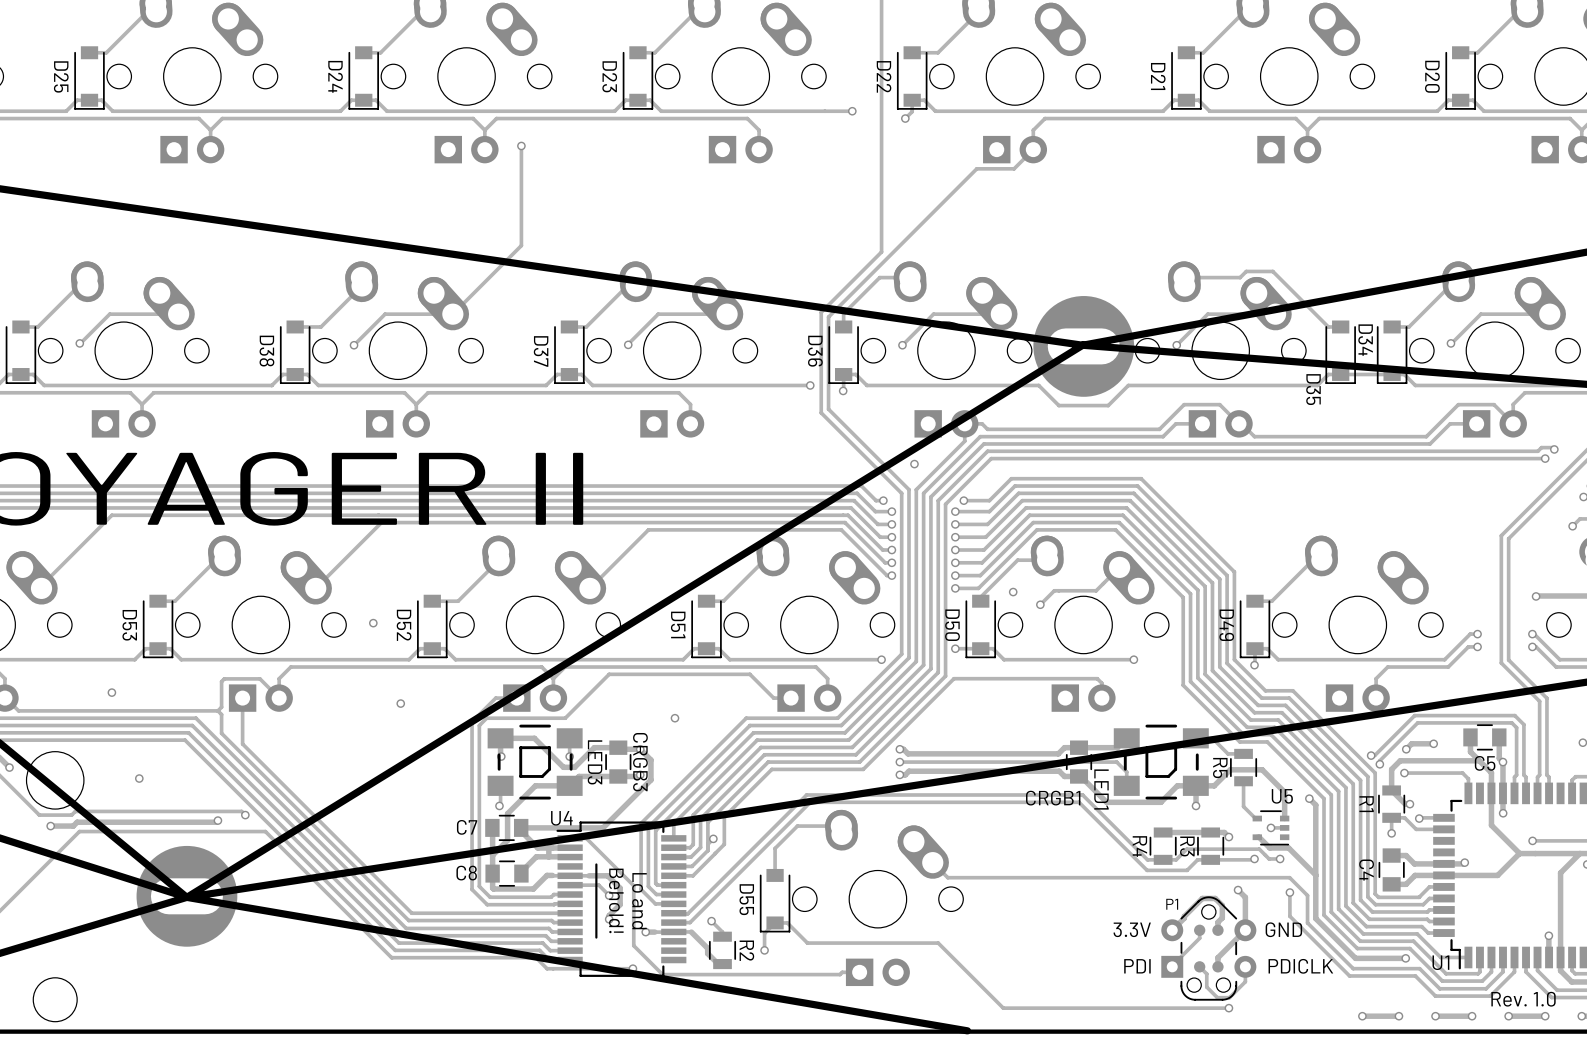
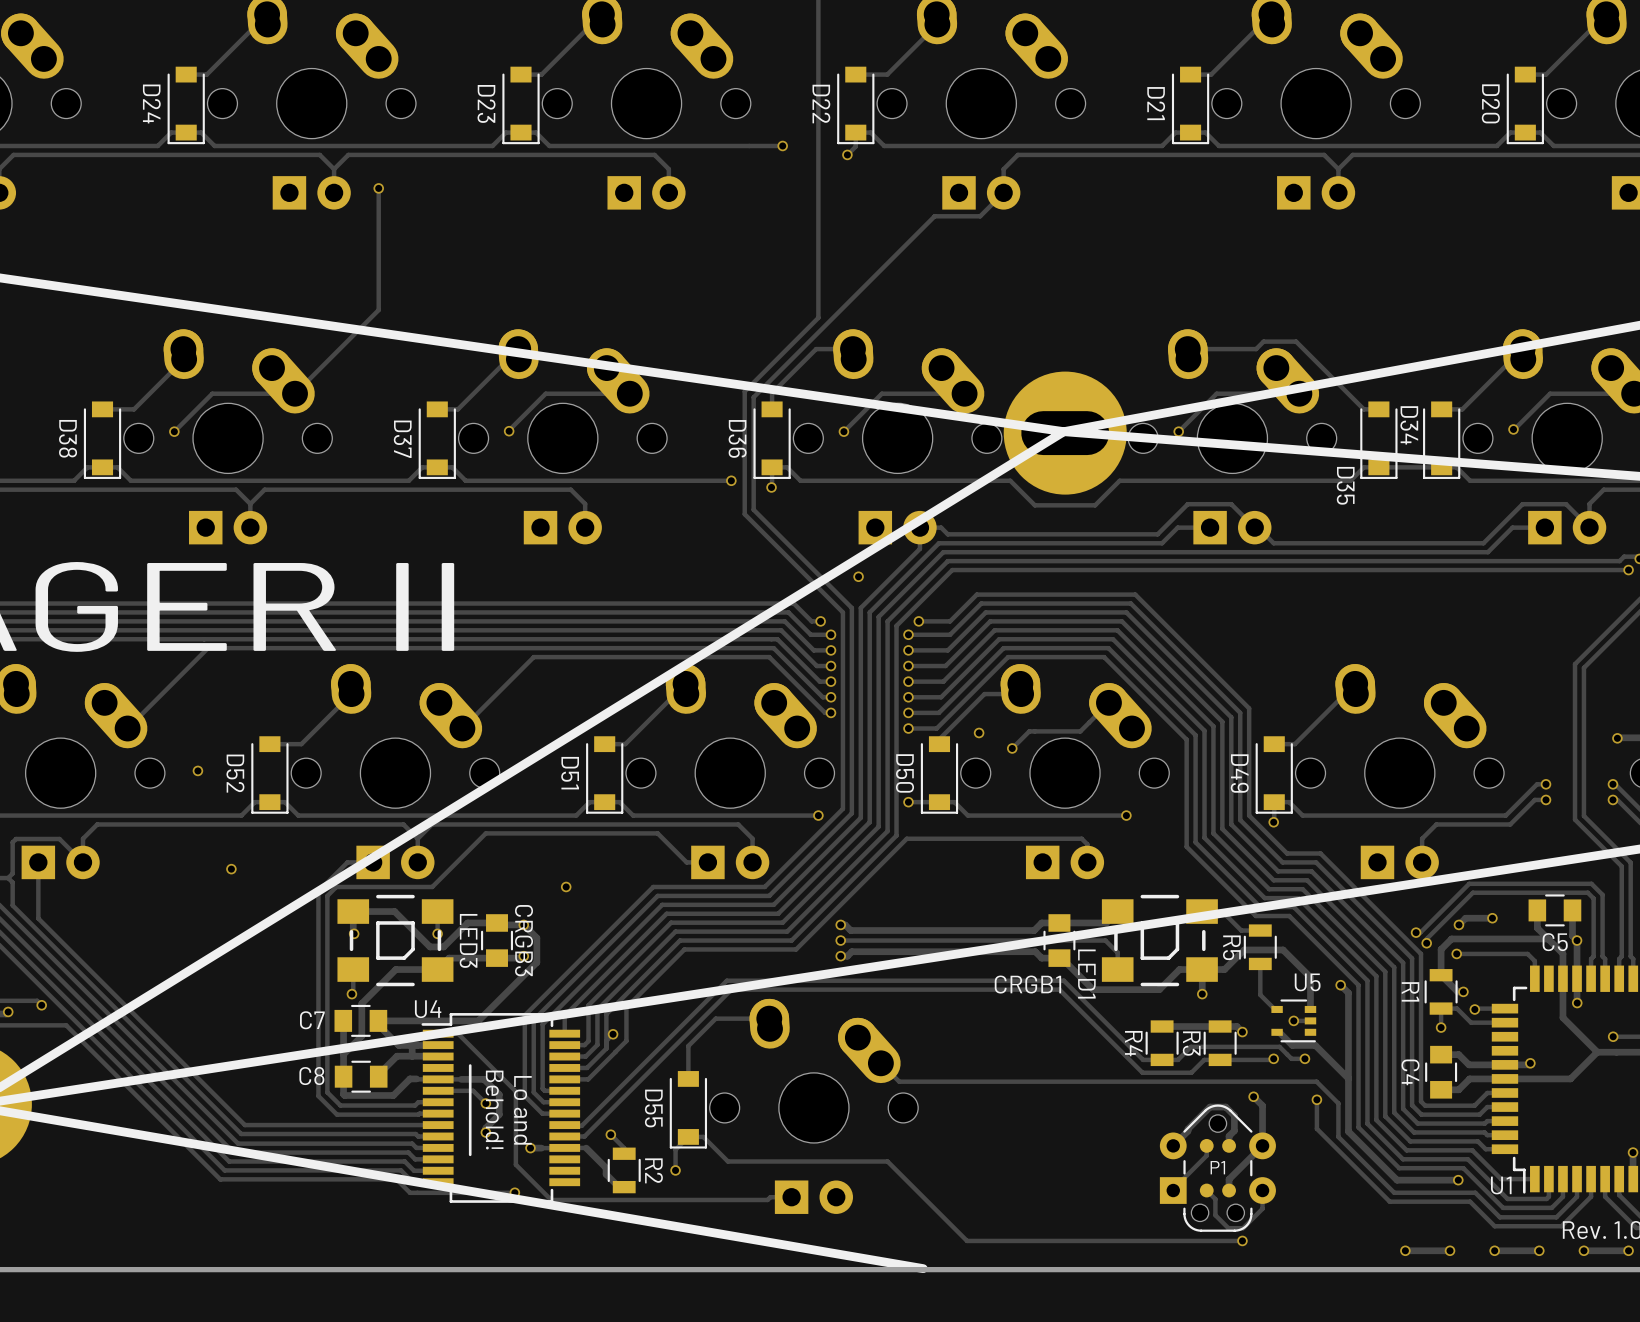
P1 name position: P1 (1172, 904) -> P1 (1217, 1167)
text: 3.3V (1132, 929) -> none
text: GND (1283, 929) -> none
text: PDI (1137, 966) -> none
text: PDICLK (1300, 966) -> none

